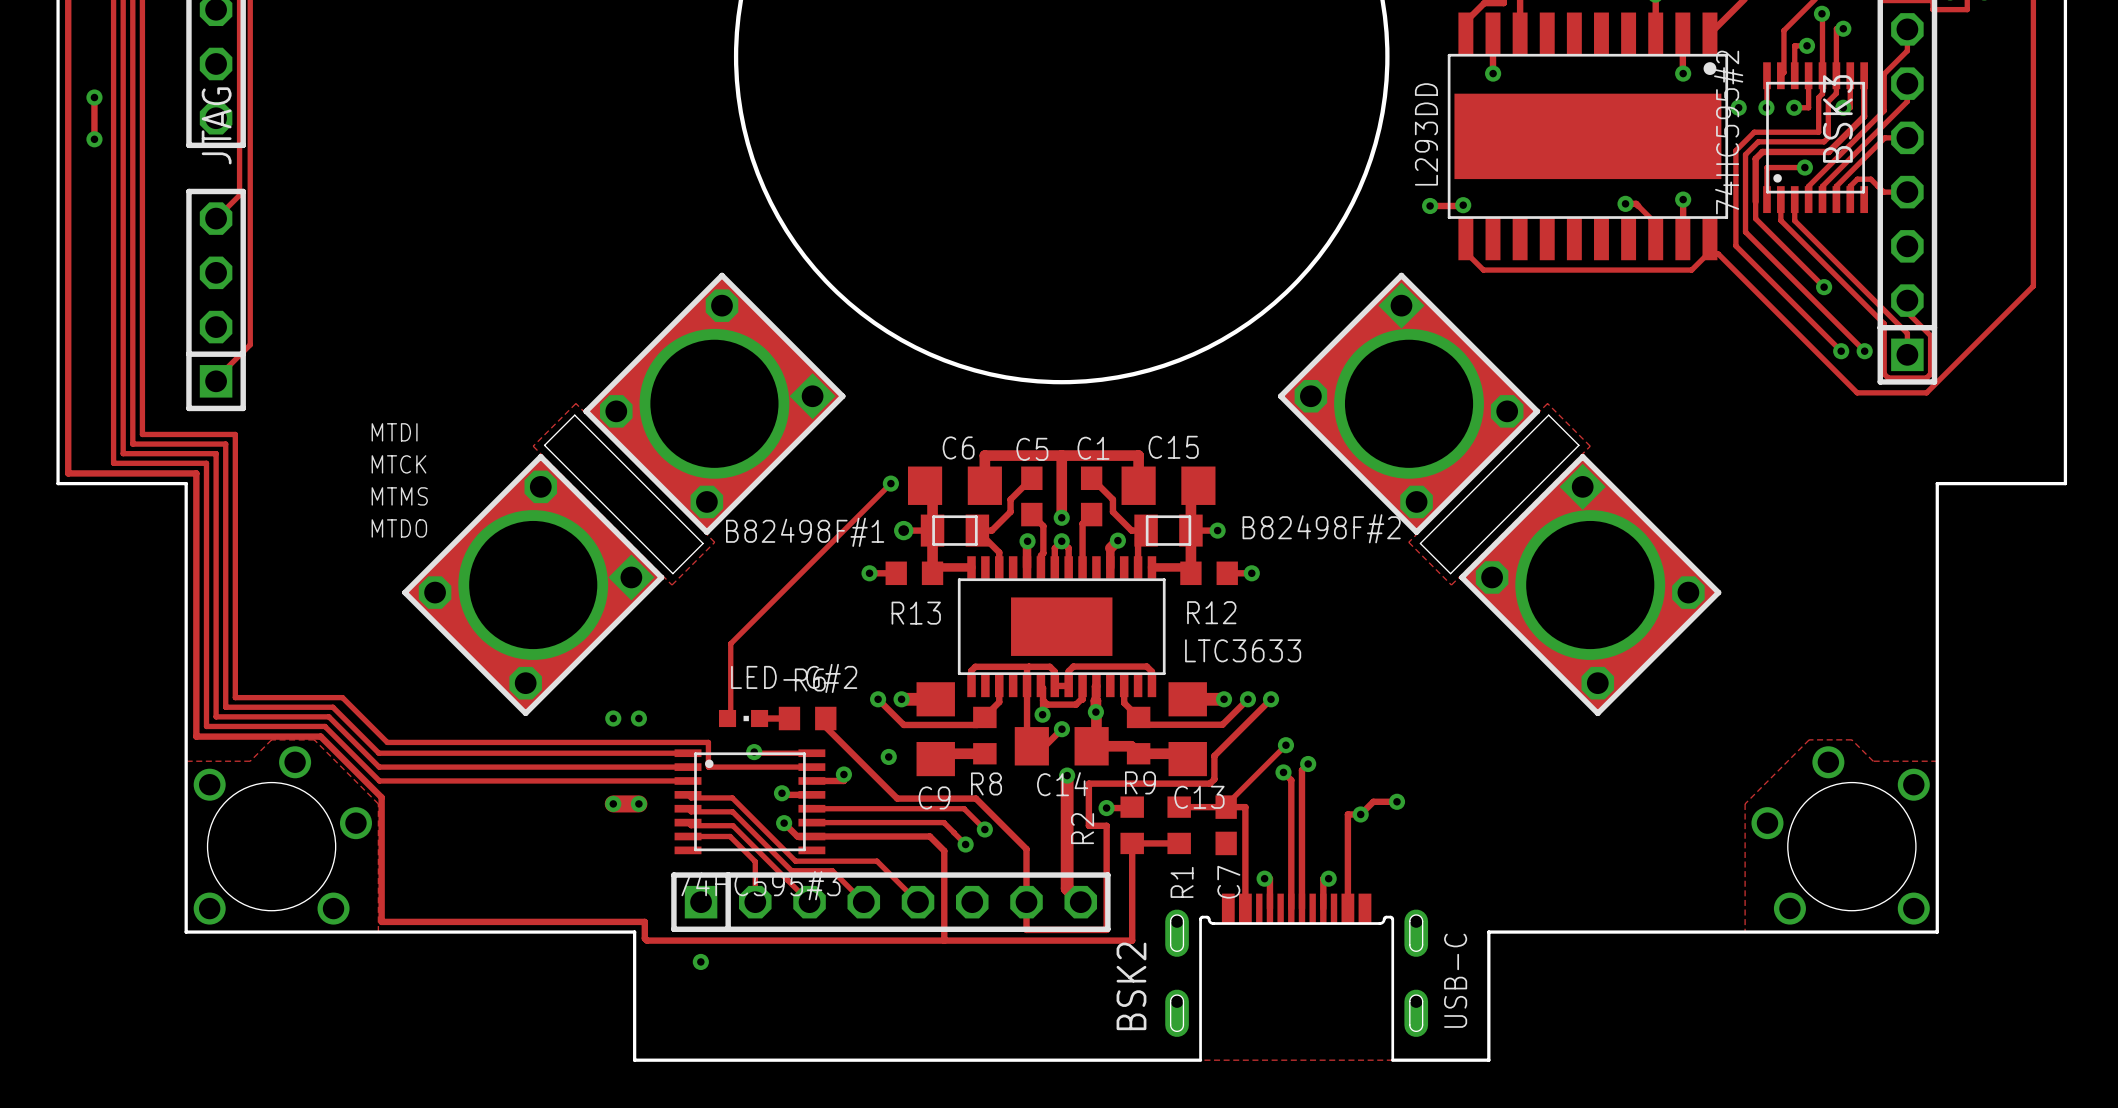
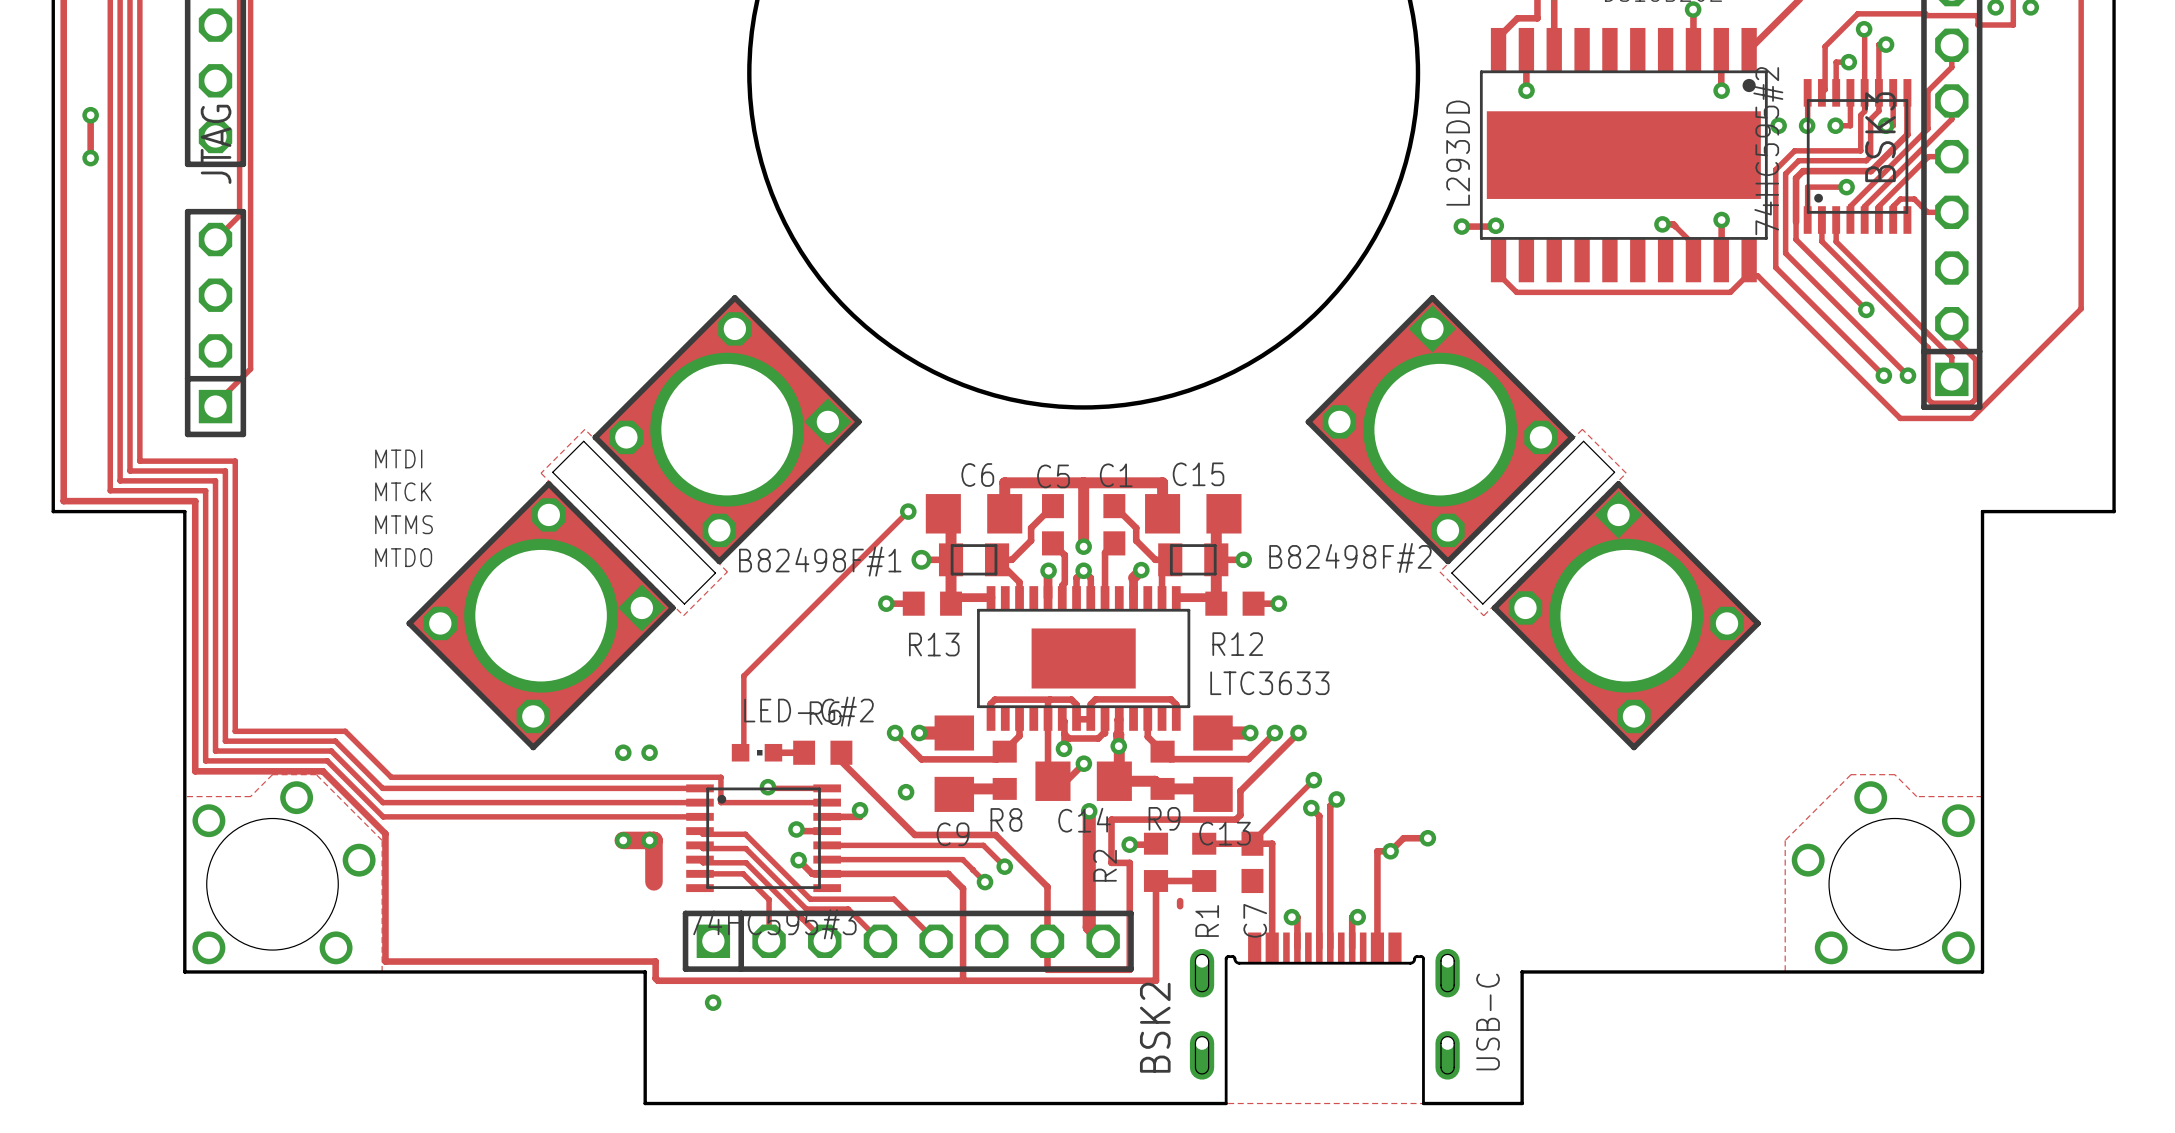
track: none -> (649, 840) (653, 840) (653, 881)
track: none -> (1180, 901) (1180, 906)

